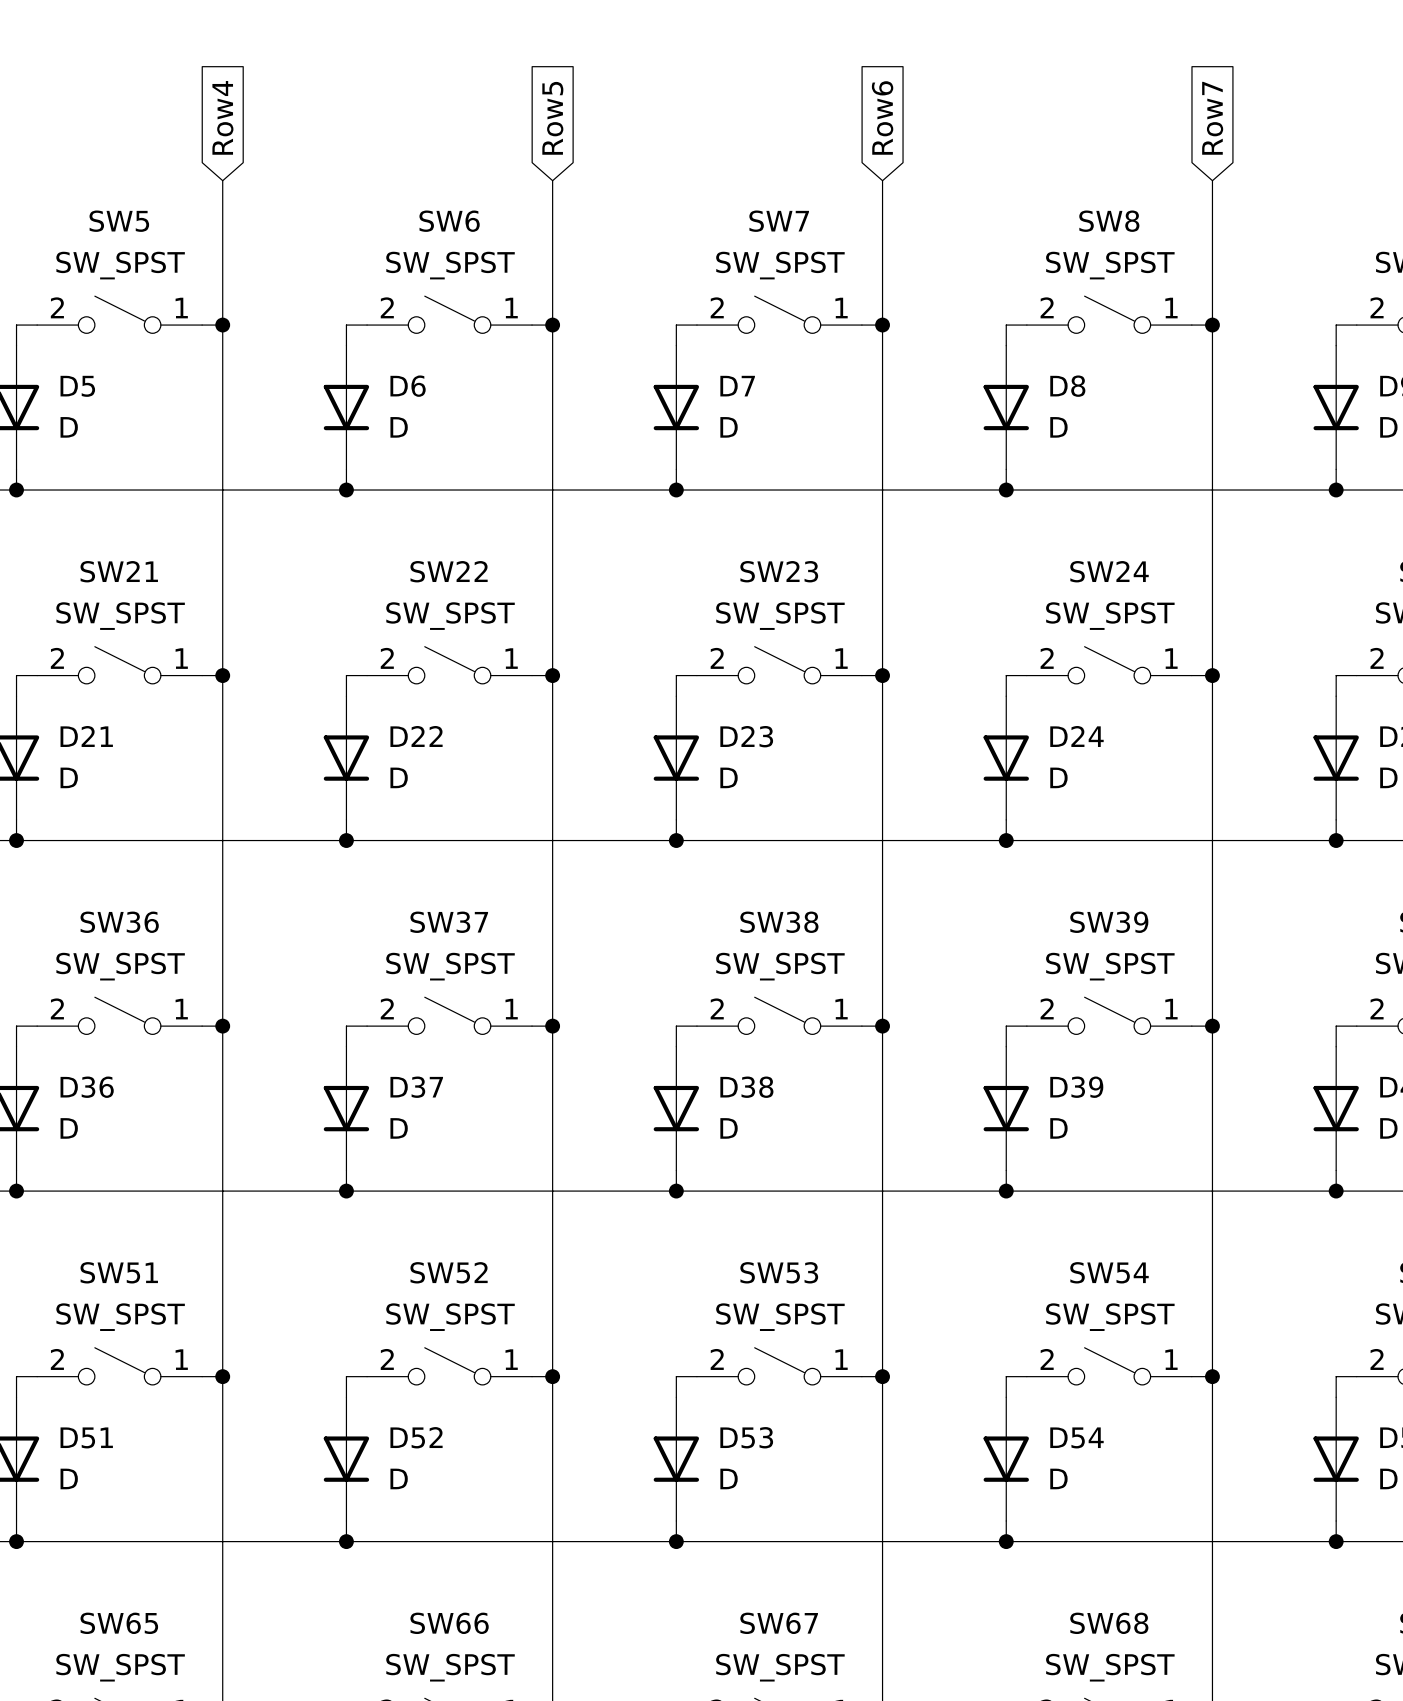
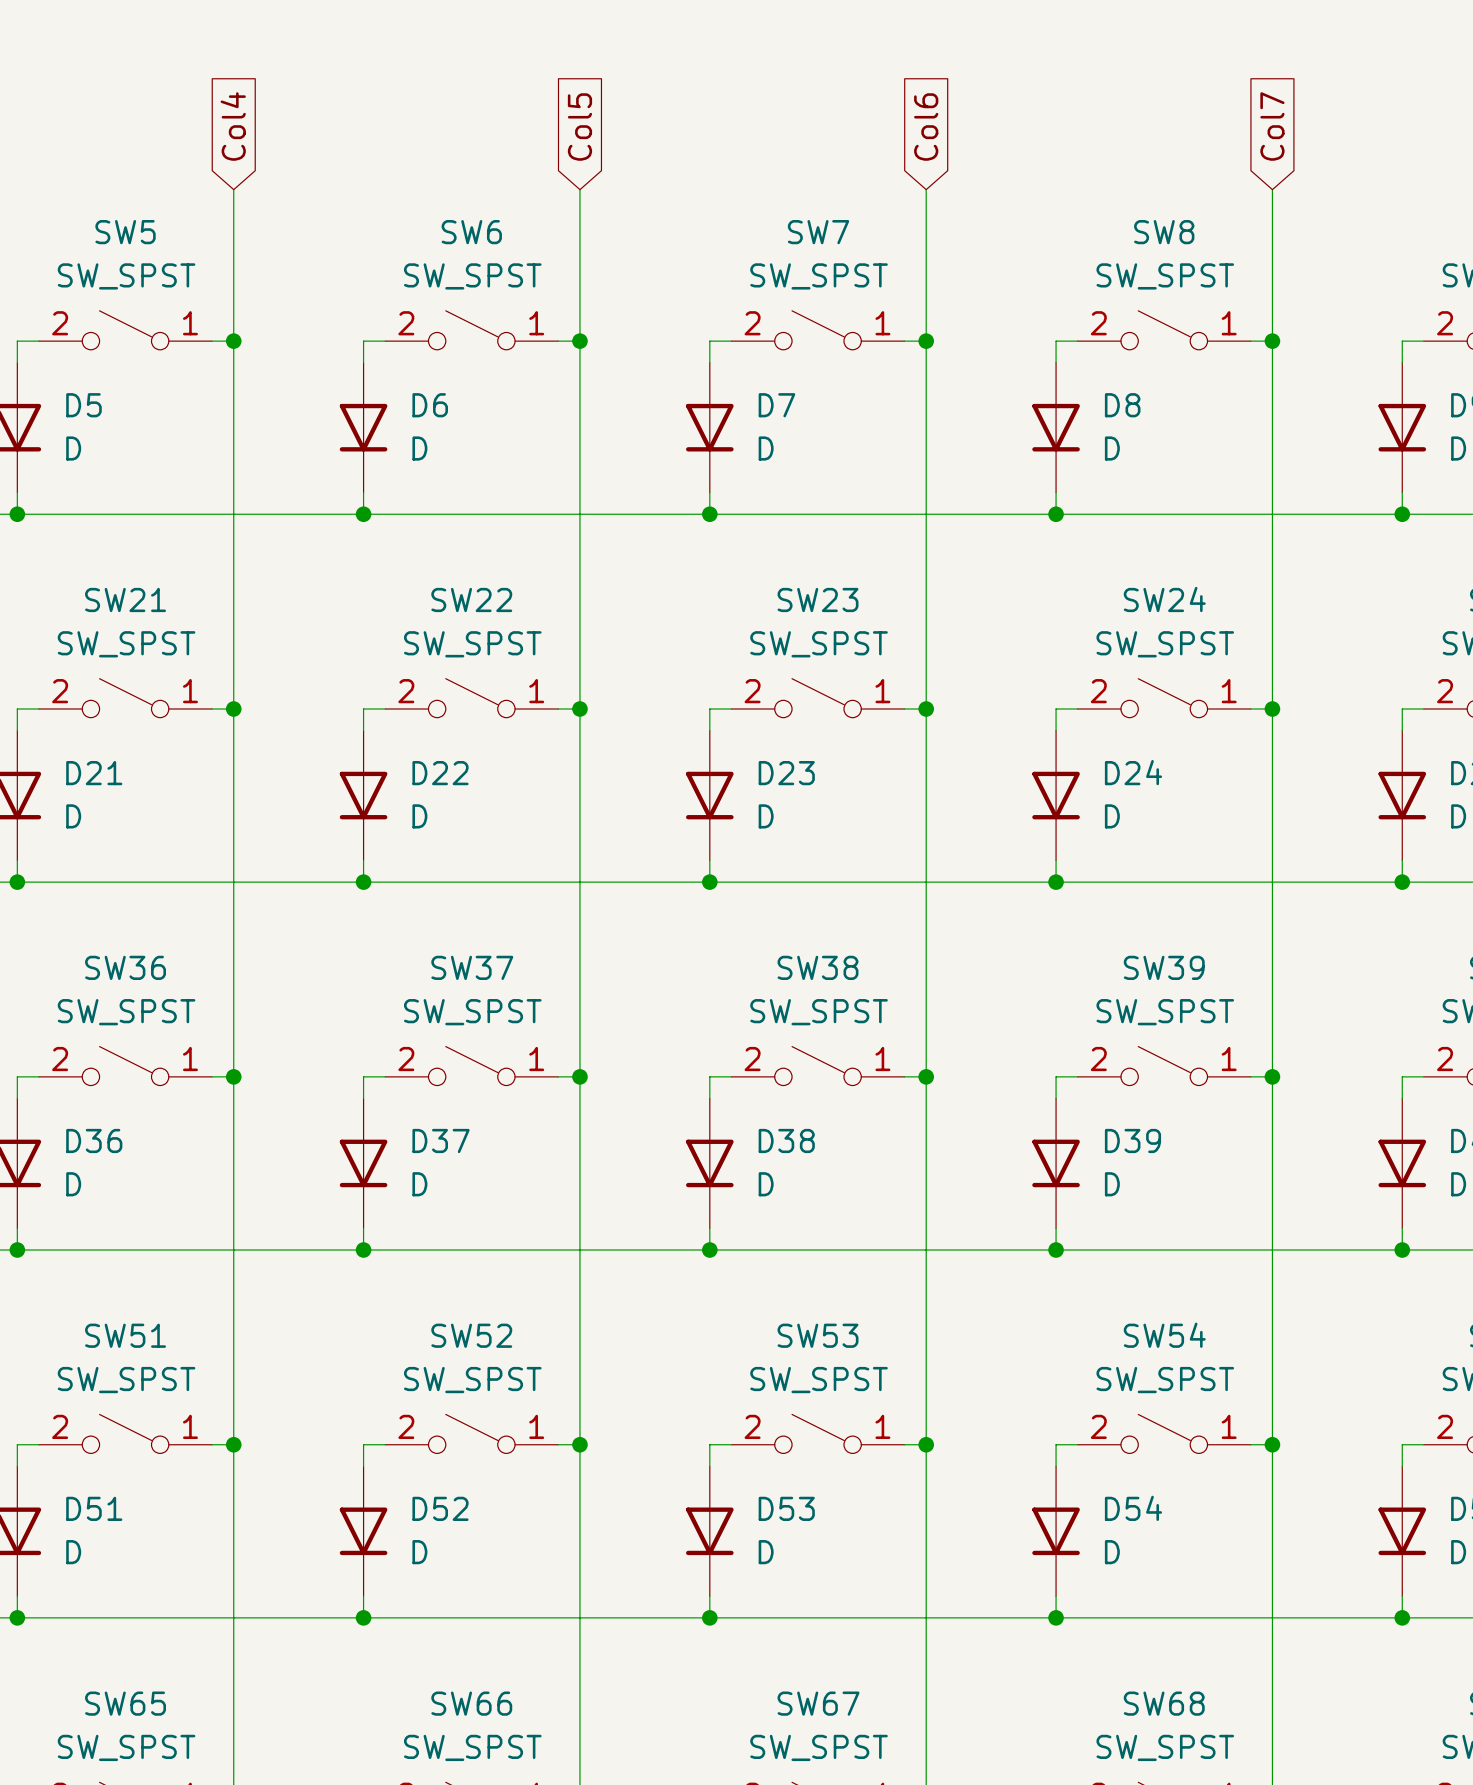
global label: Row4 (222, 117) -> Col4 (233, 126)
global label: Row6 (882, 117) -> Col6 (926, 127)
global label: Row5 (552, 118) -> Col5 (579, 127)
global label: Row7 (1212, 118) -> Col7 (1272, 126)

